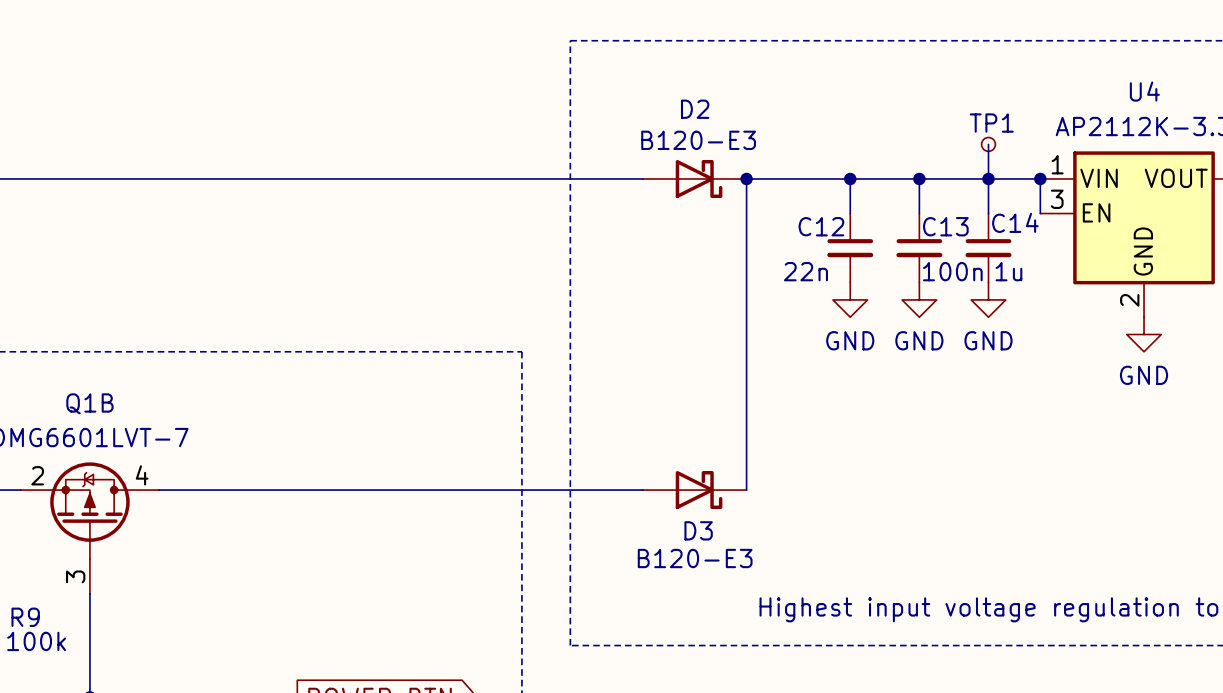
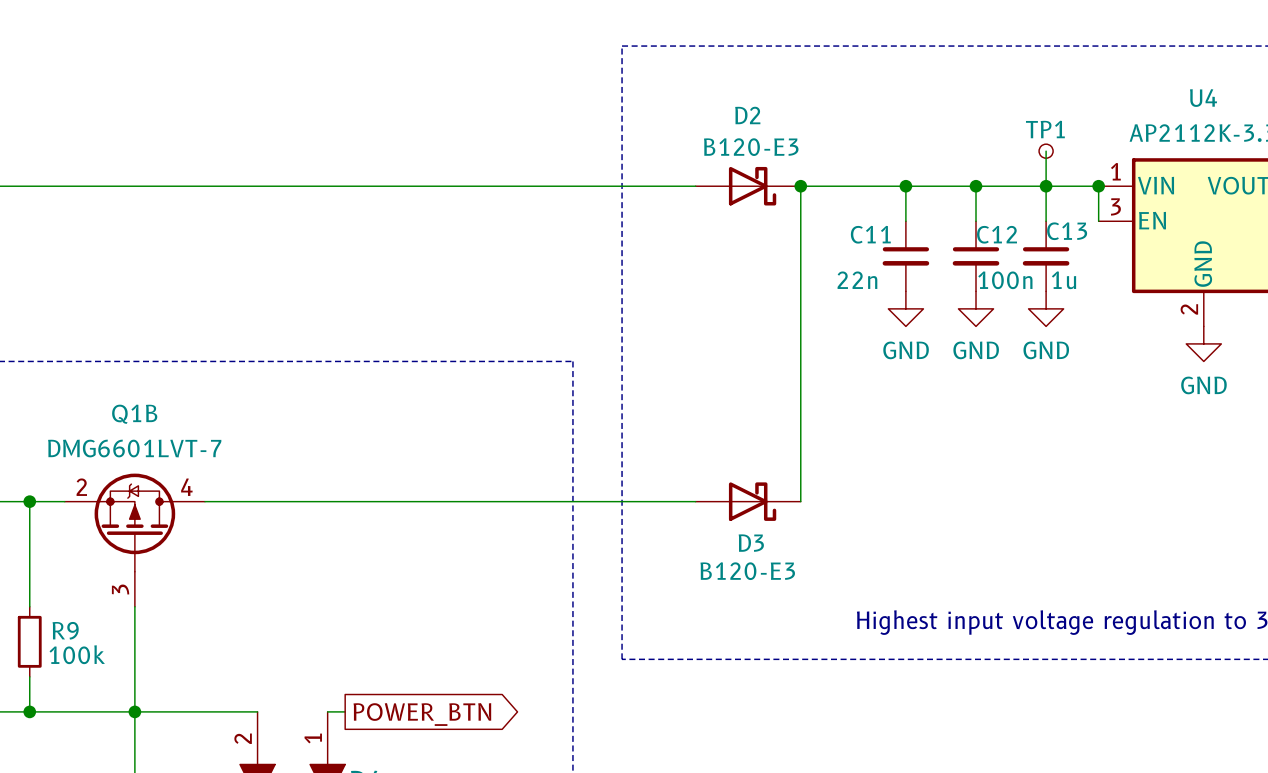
C14 name: C14 (1015, 222) -> C13 (1067, 231)
C12 name: C12 (821, 226) -> C11 (870, 234)
C13 name: C13 (945, 226) -> C12 (997, 234)

